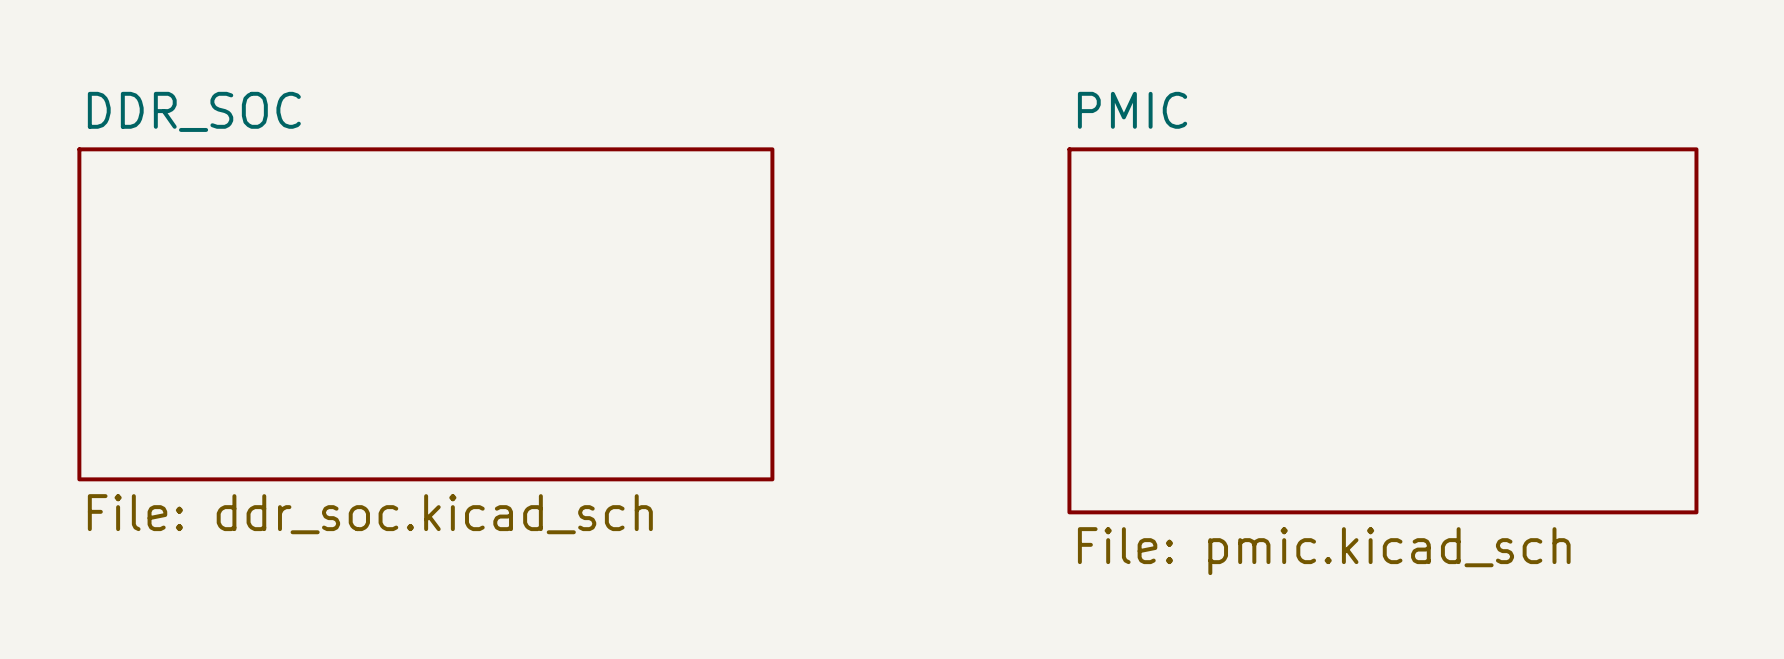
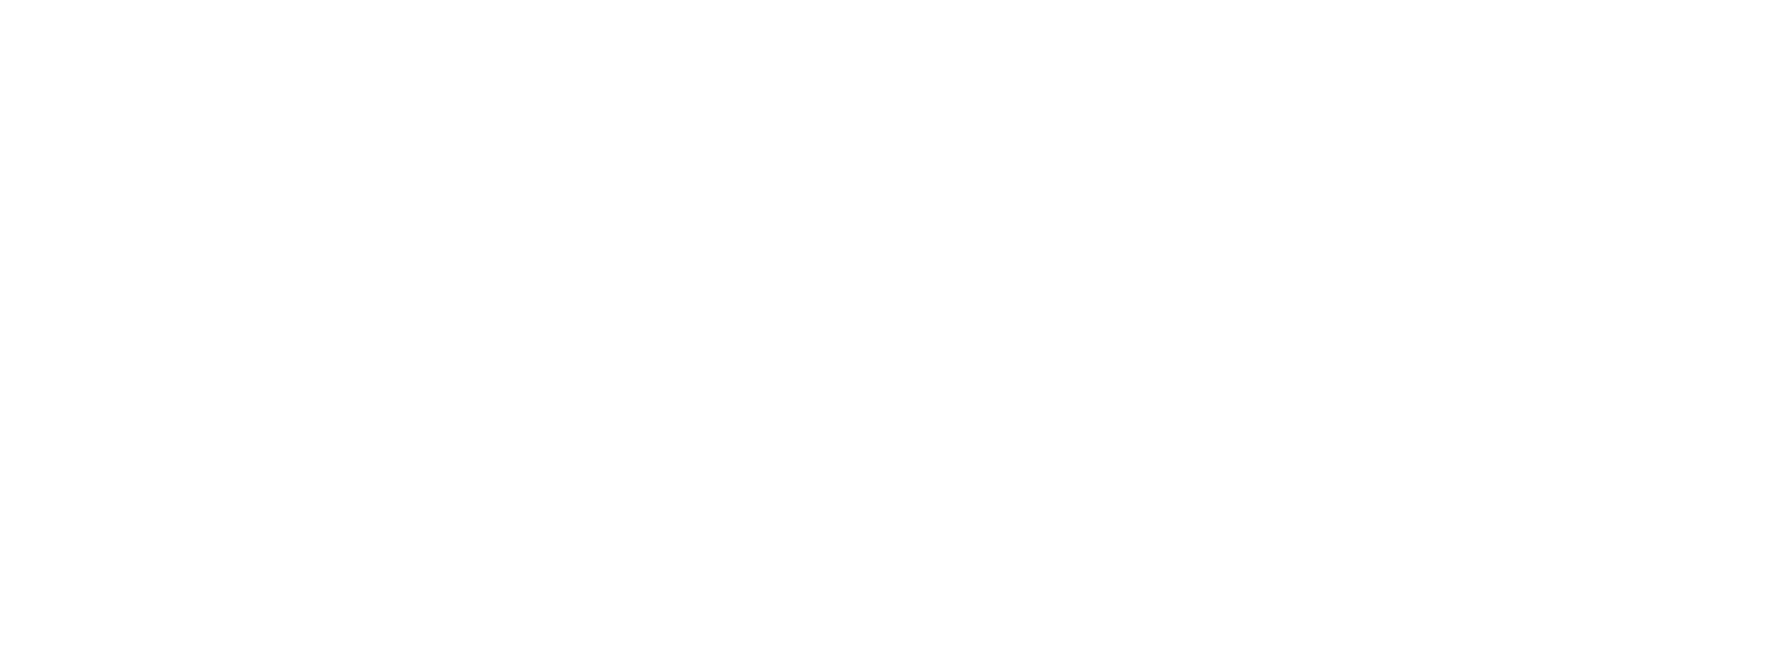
sheet DDR_SOC: File: ddr_soc.kicad_sch (425, 314) -> none
sheet PMIC: File: pmic.kicad_sch (1382, 330) -> none

